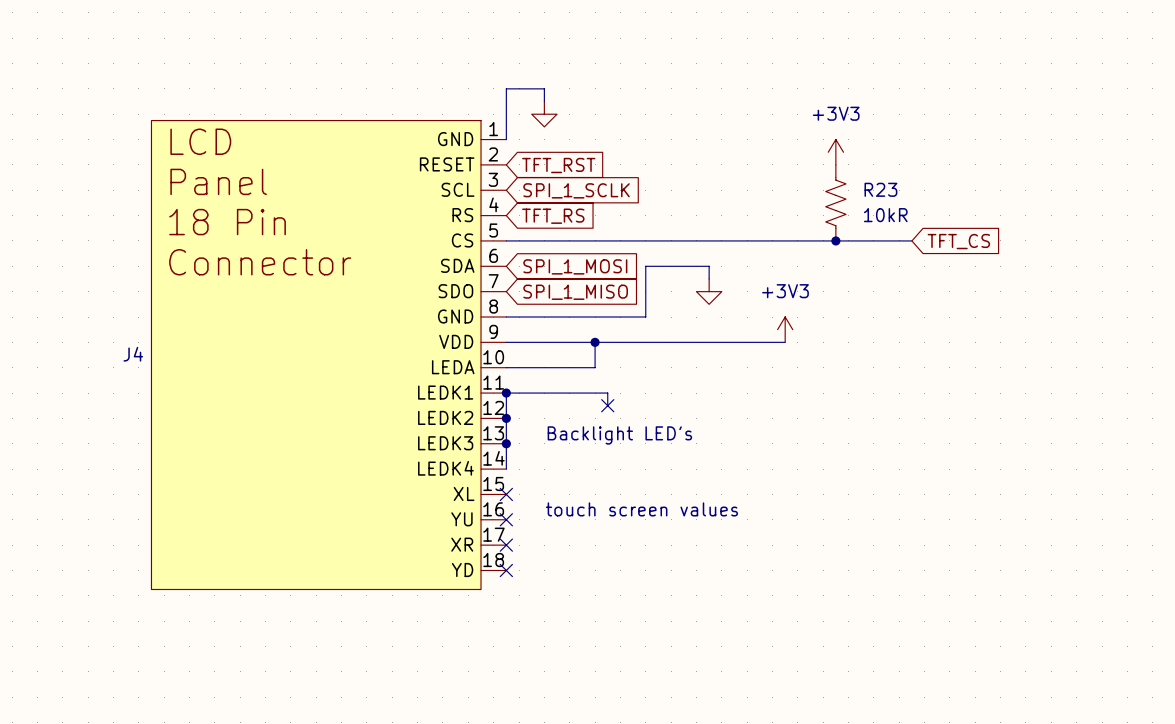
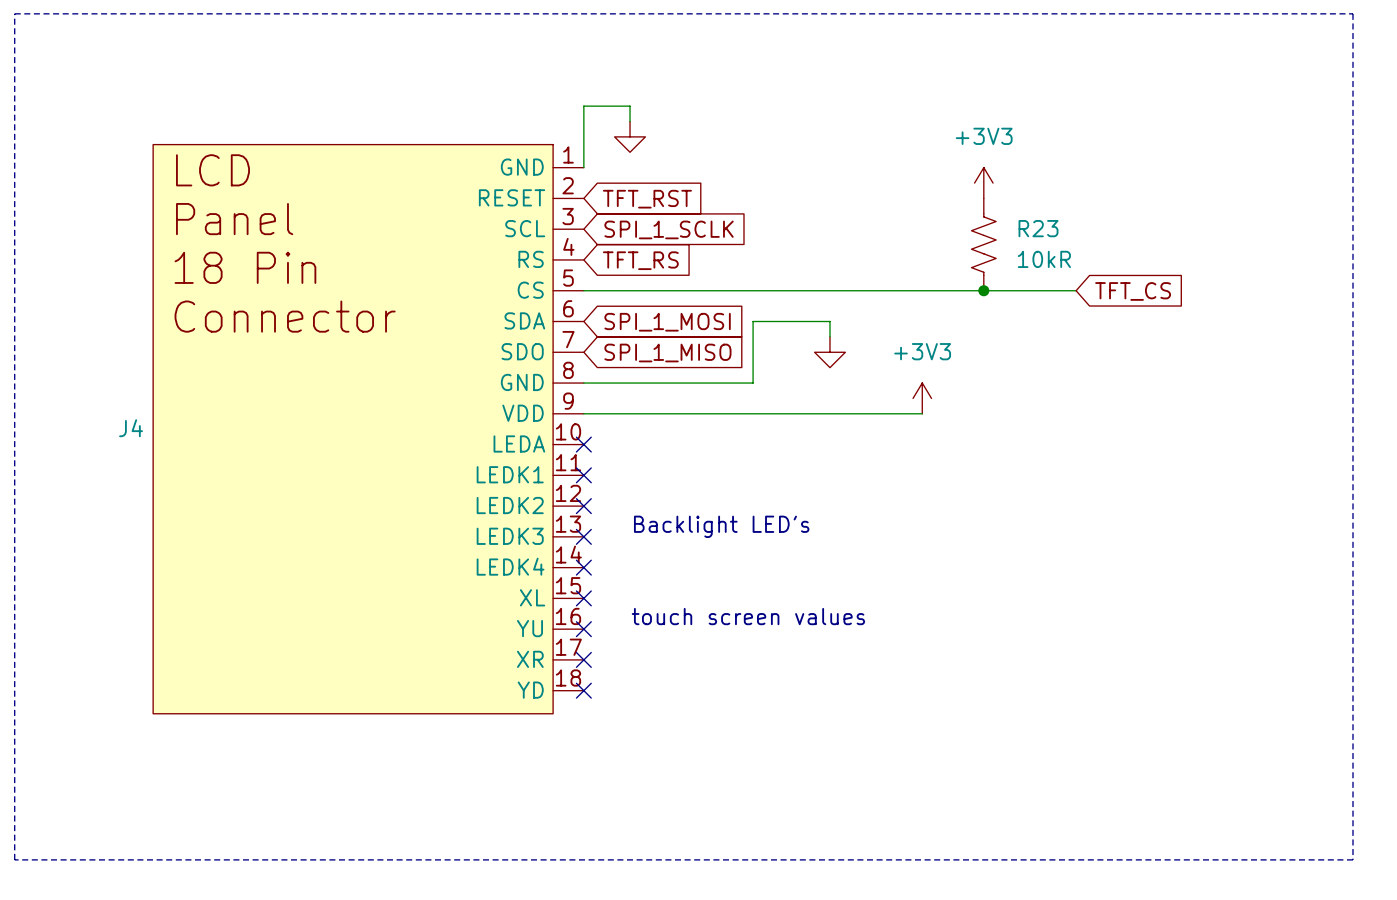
line: none -> (14, 13) (1353, 13) (1353, 859) (14, 859) (14, 13)
wire: (595, 342) (595, 367) (506, 367) -> none
junction: (595, 342) -> none
no-connect mark: none -> (583, 444)
junction: (506, 393) -> none
no-connect mark: none -> (583, 475)
wire: (607, 405) (607, 393) (506, 393) (506, 469) -> none
no-connect mark: (607, 405) -> none
junction: (506, 418) -> none
no-connect mark: none -> (583, 506)
junction: (506, 443) -> none
no-connect mark: none -> (583, 536)
no-connect mark: none -> (583, 567)

